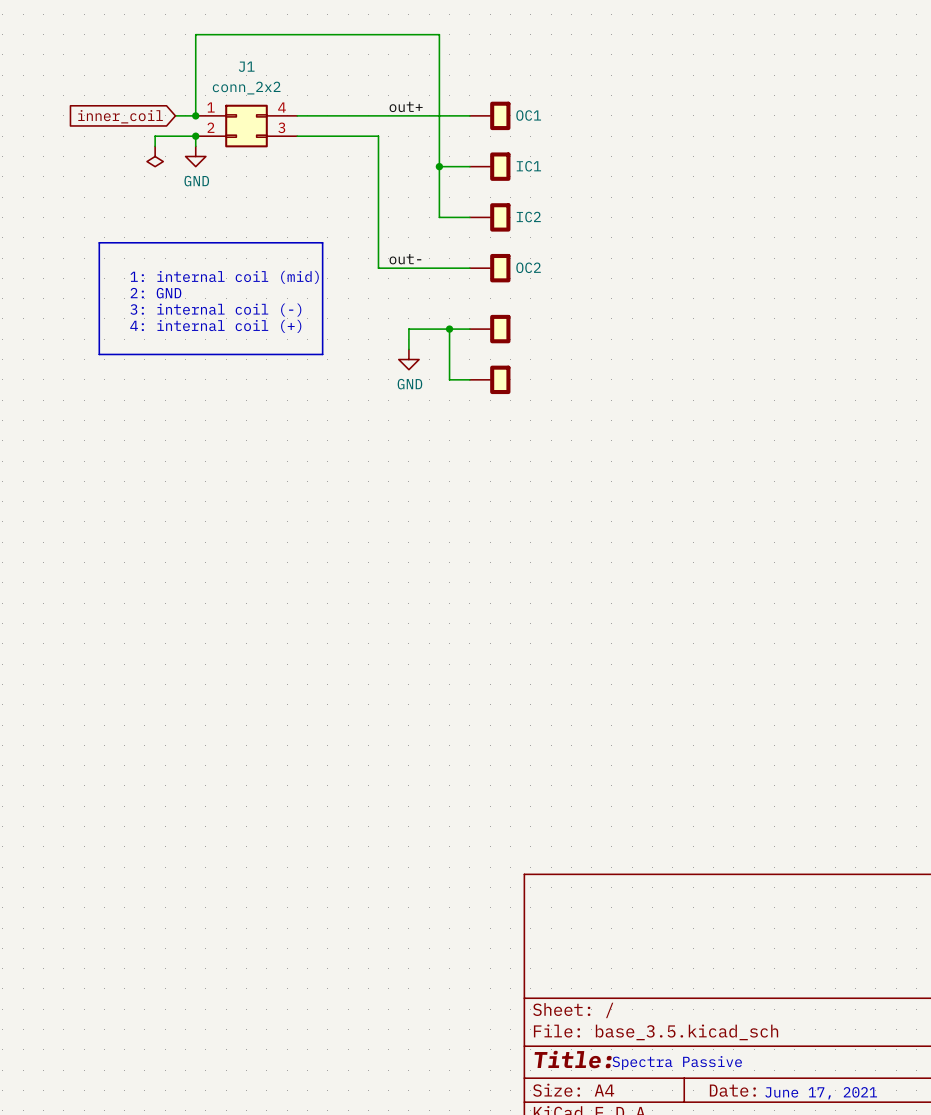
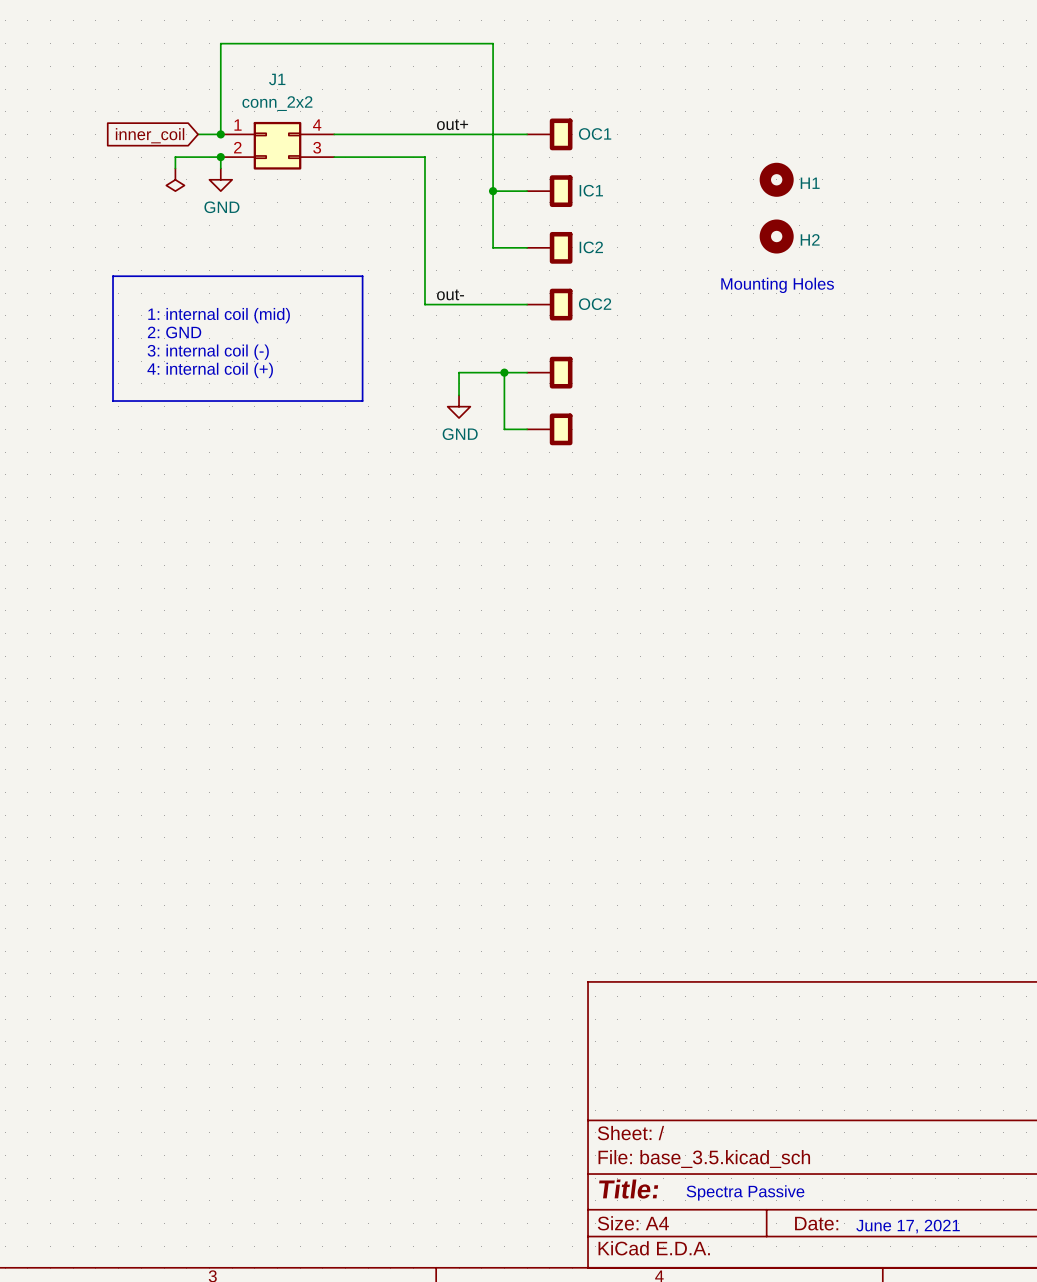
H1: none -> (776, 179)
H2: none -> (776, 236)
text: none -> Mounting Holes (777, 285)

